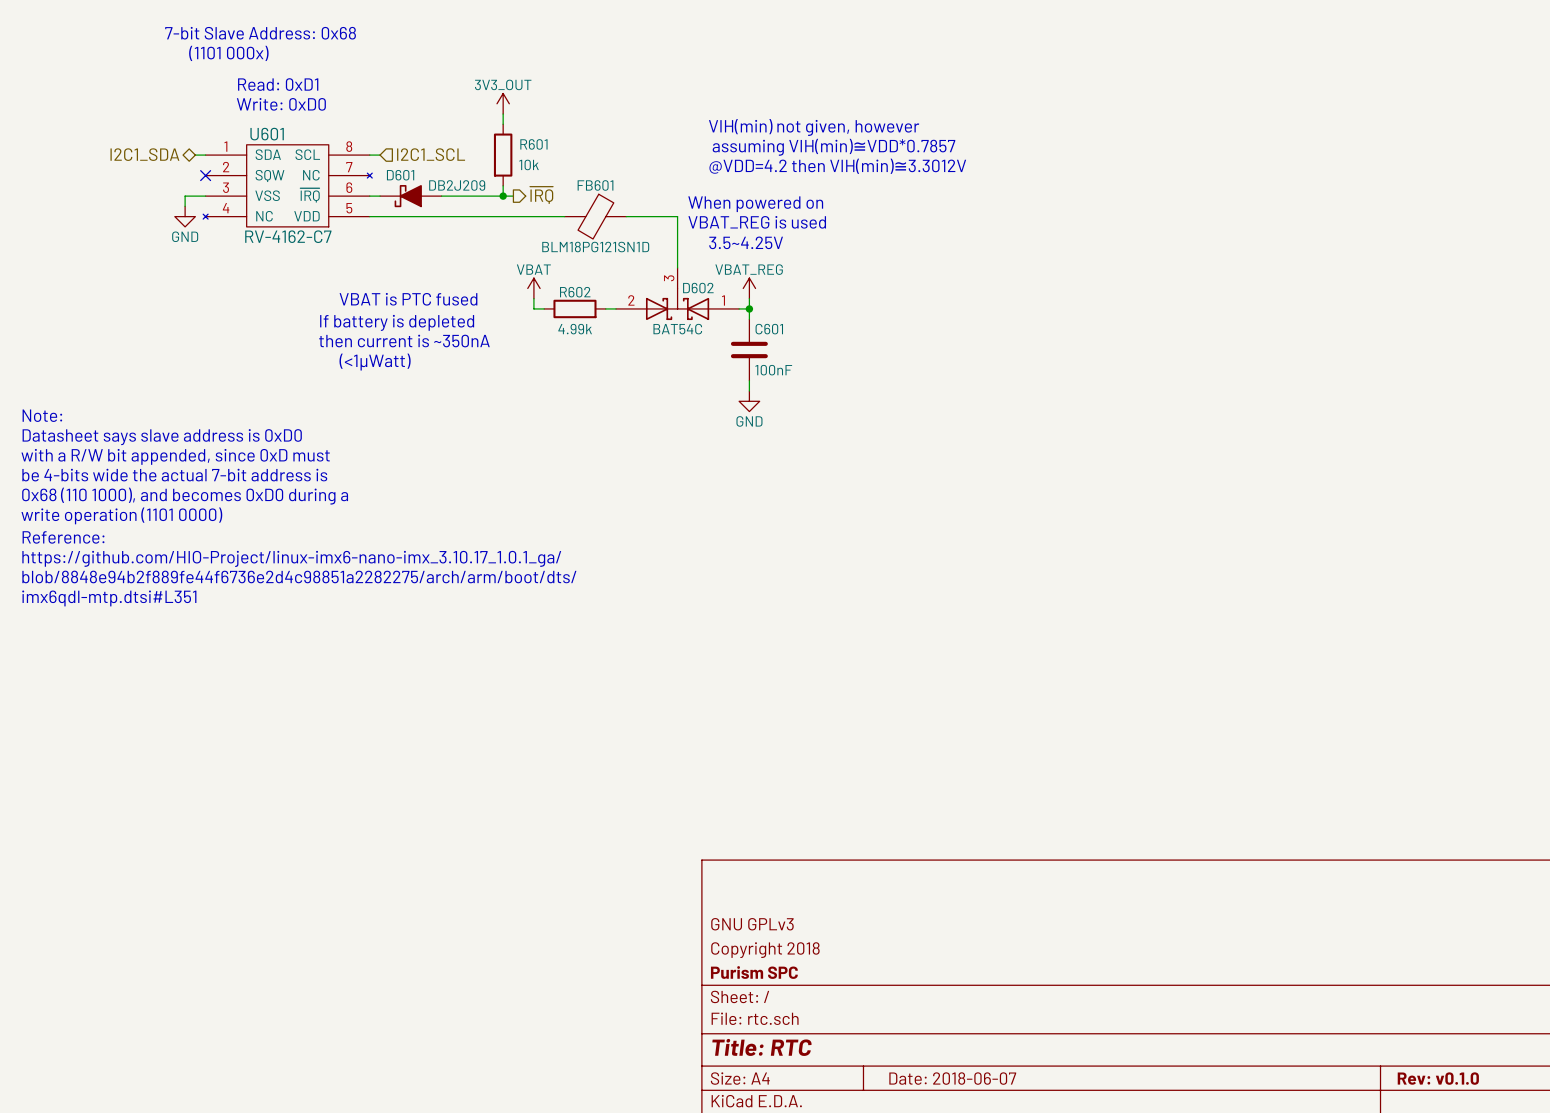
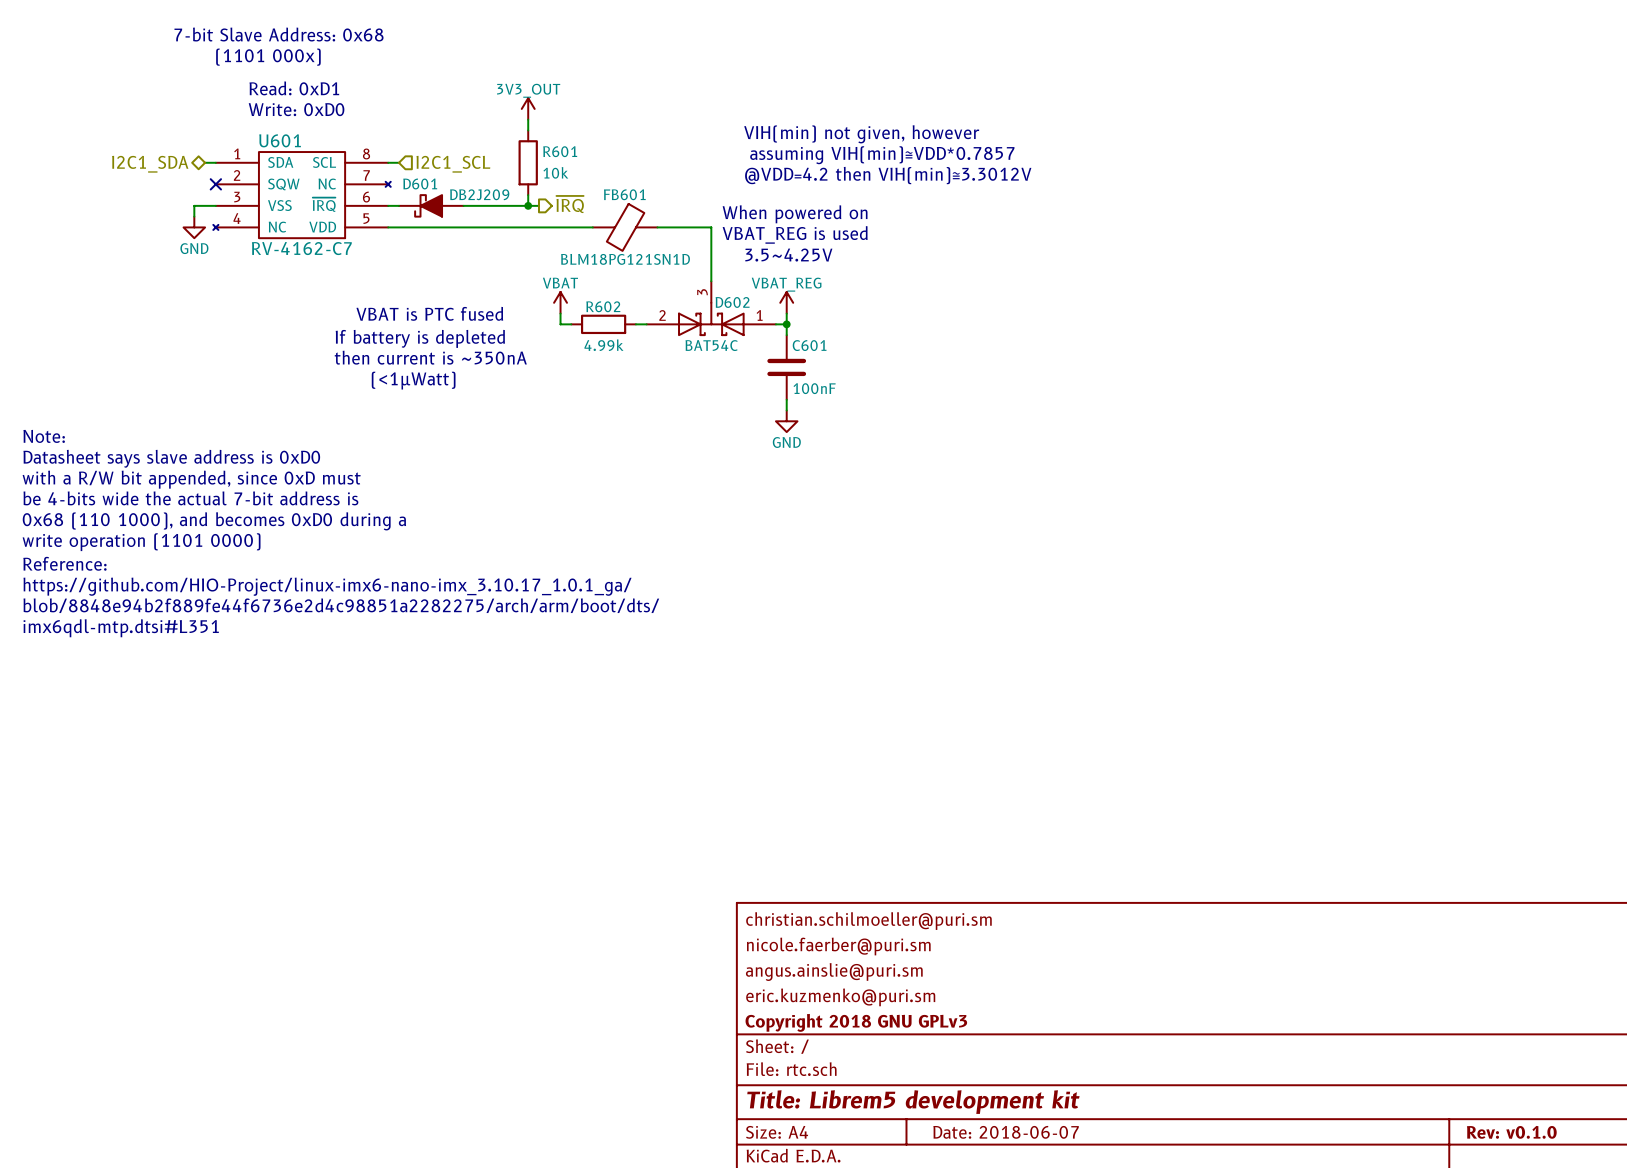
title block: none -> christian.schilmoeller@puri.sm (868, 921)
title block: none -> nicole.faerber@puri.sm (838, 946)
title block: GNU GPLv3 (752, 924) -> angus.ainslie@puri.sm (834, 972)
title block: Copyright 2018 (765, 950) -> eric.kuzmenko@puri.sm (840, 997)
title block: Purism SPC (754, 972) -> Copyright 2018 GNU GPLv3 (856, 1022)
title block: Title: RTC (762, 1047) -> Title: Librem5 development kit (913, 1102)

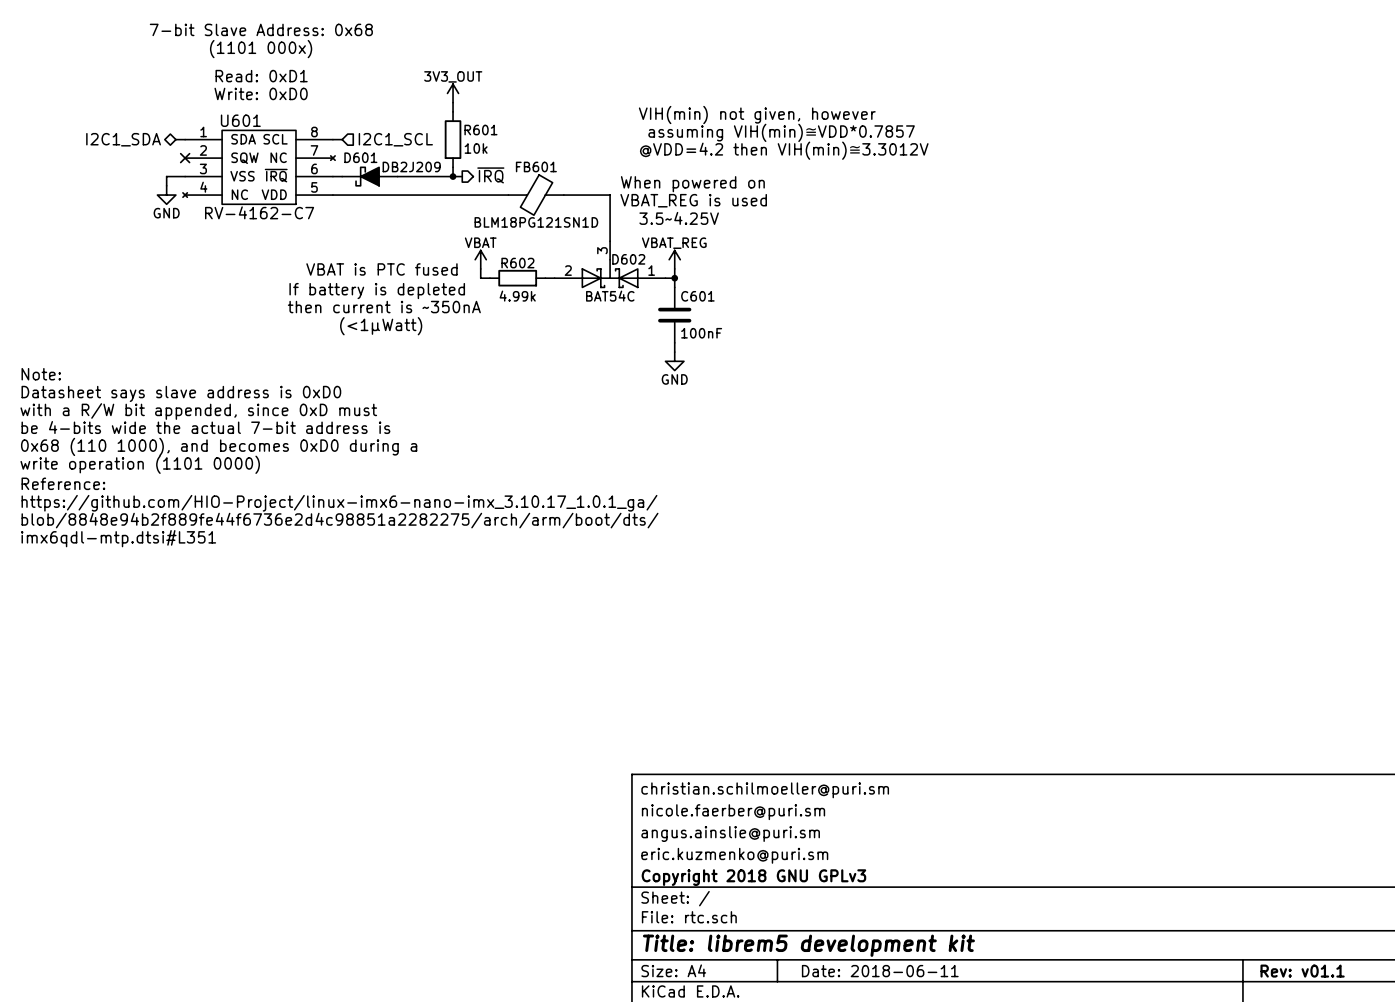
title block: Title: Librem5 development kit (913, 1102) -> Title: librem5 development kit (808, 945)
title block: Date: 2018-06-07 (1006, 1132) -> Date: 2018-06-11 (880, 971)
title block: Rev: v0.1.0 (1511, 1132) -> Rev: v01.1 (1302, 971)

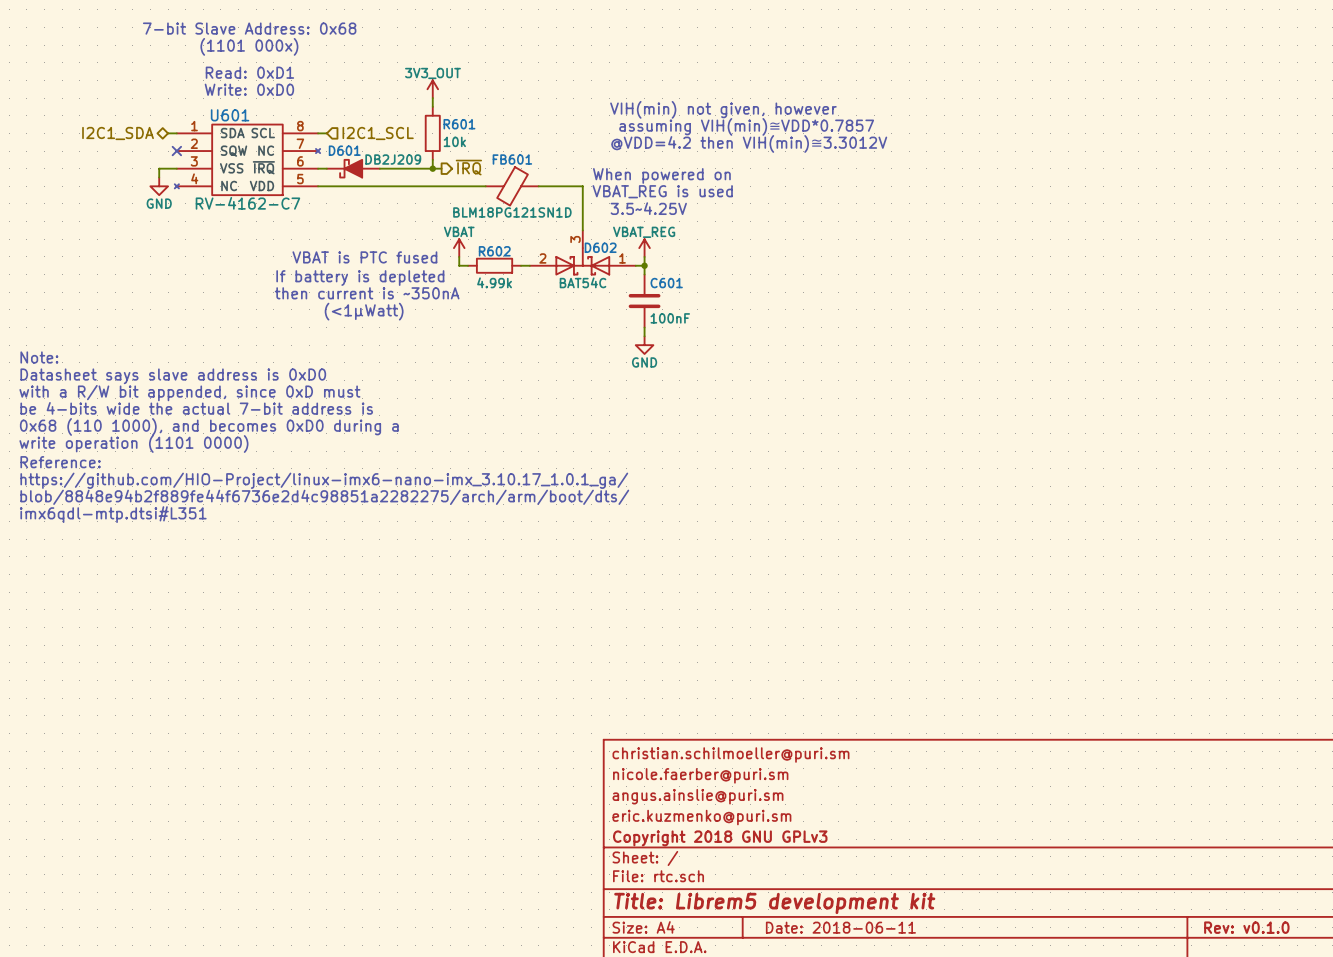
title block: Title: librem5 development kit (808, 945) -> Title: Librem5 development kit (774, 903)
title block: Rev: v01.1 (1302, 971) -> Rev: v0.1.0 (1246, 927)

